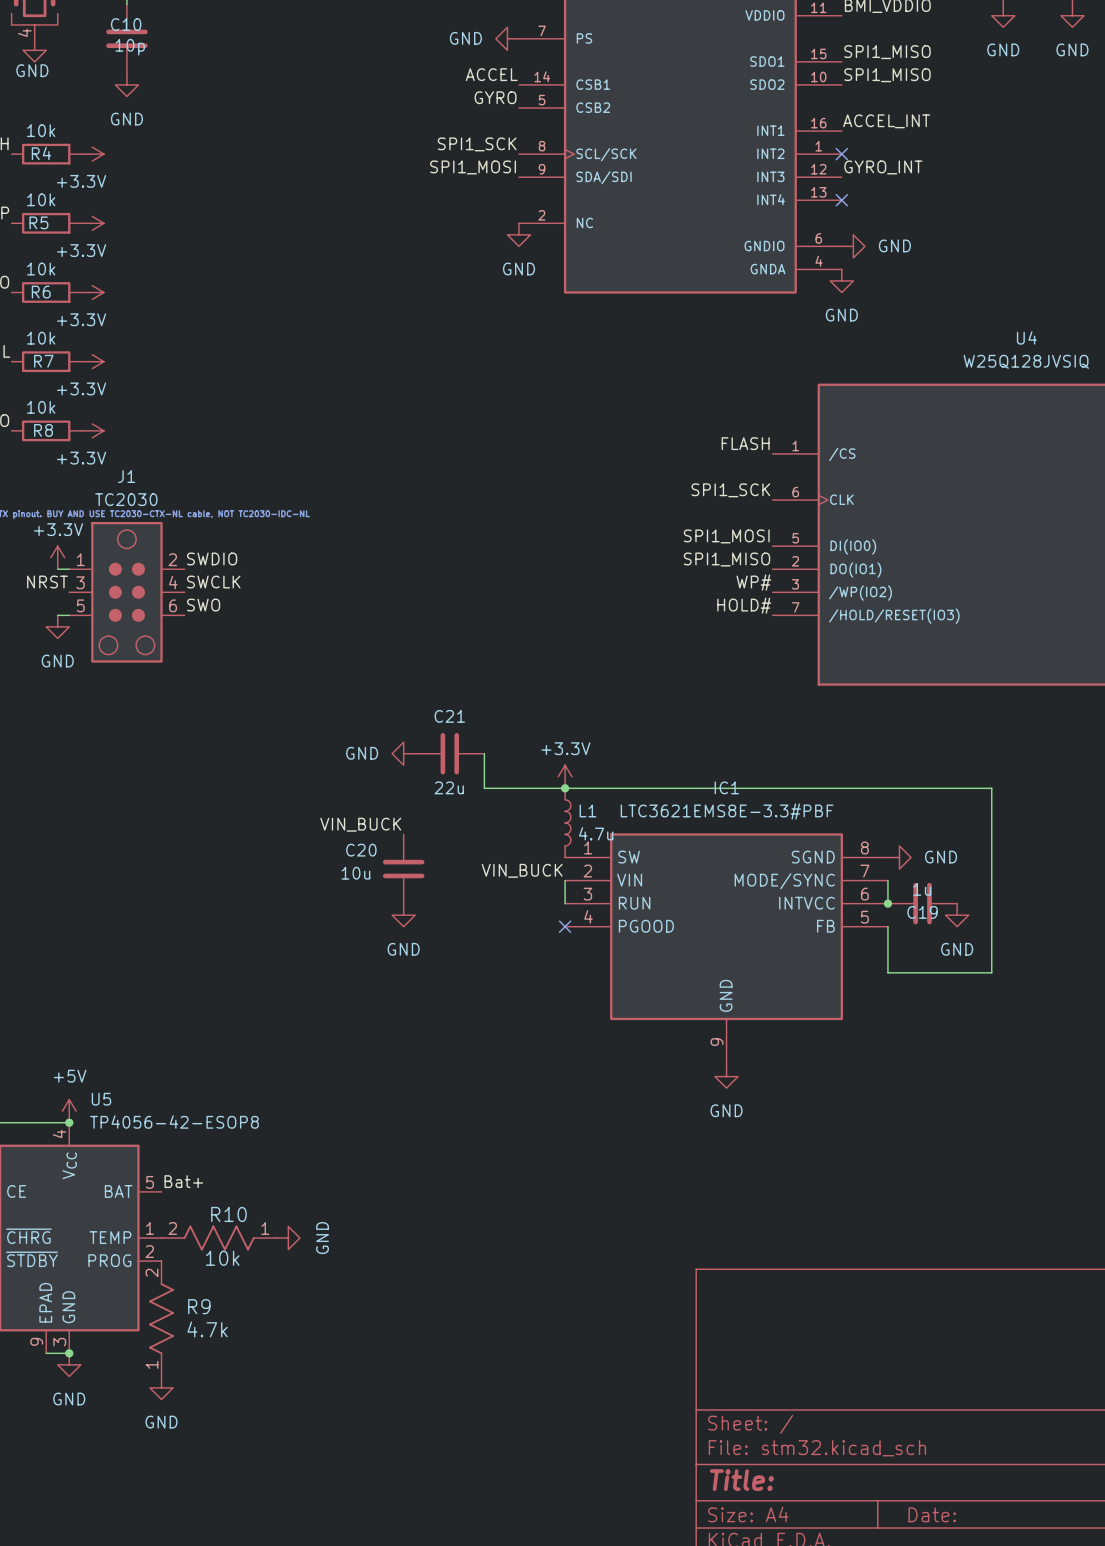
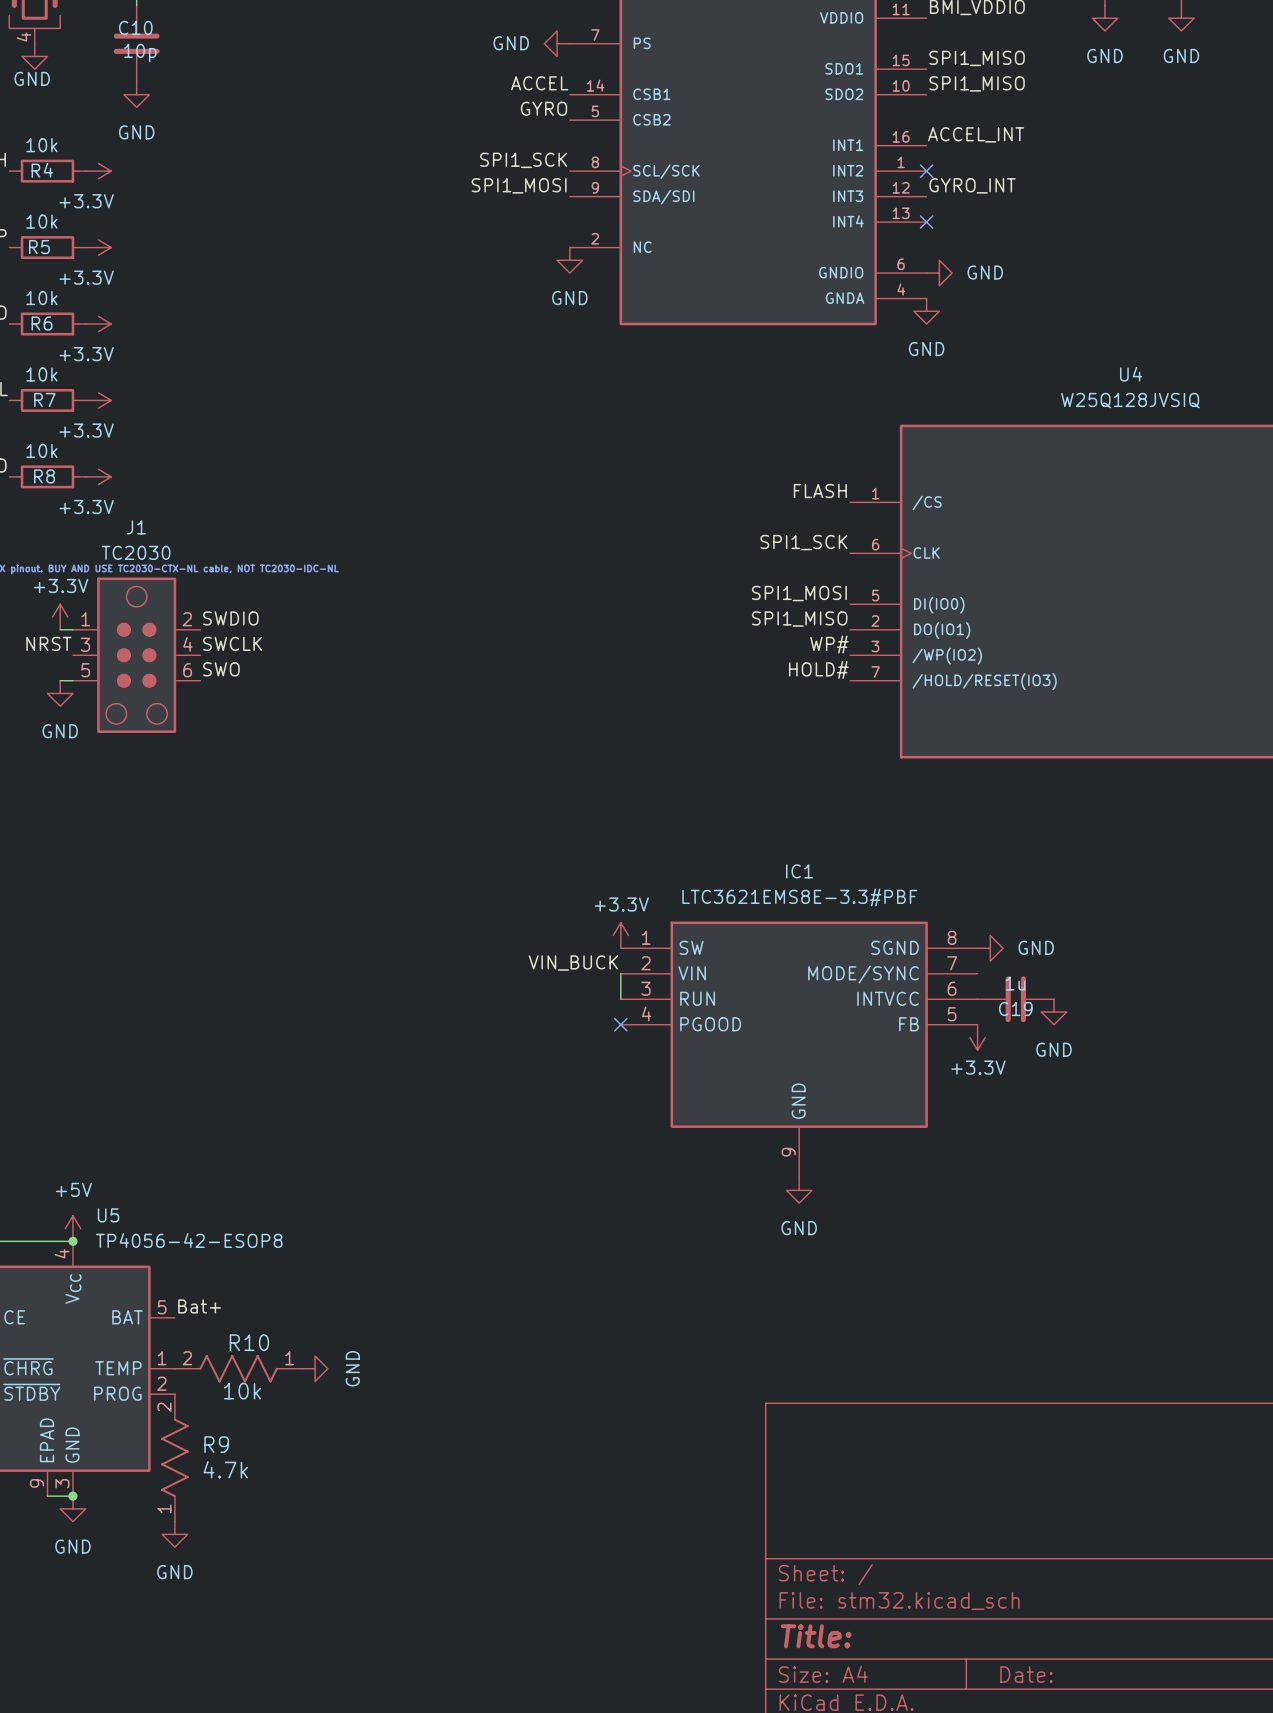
power symbol: GND (403, 753) -> none
C21: 22u (449, 753) -> none
wire: (484, 753) (484, 788) (991, 788) (991, 972) (887, 972) (887, 926) -> none
power symbol position: +3.3V (565, 776) -> +3.3V (620, 935)
junction: (565, 788) -> none
L1: 4.7u (567, 822) -> none
label: VIN_BUCK (360, 824) -> none
C20: 10u (403, 869) -> none
wire: (887, 880) (887, 903) -> none
junction: (887, 903) -> none
power symbol: GND (403, 915) -> none
power symbol: none -> +3.3V (977, 1037)

